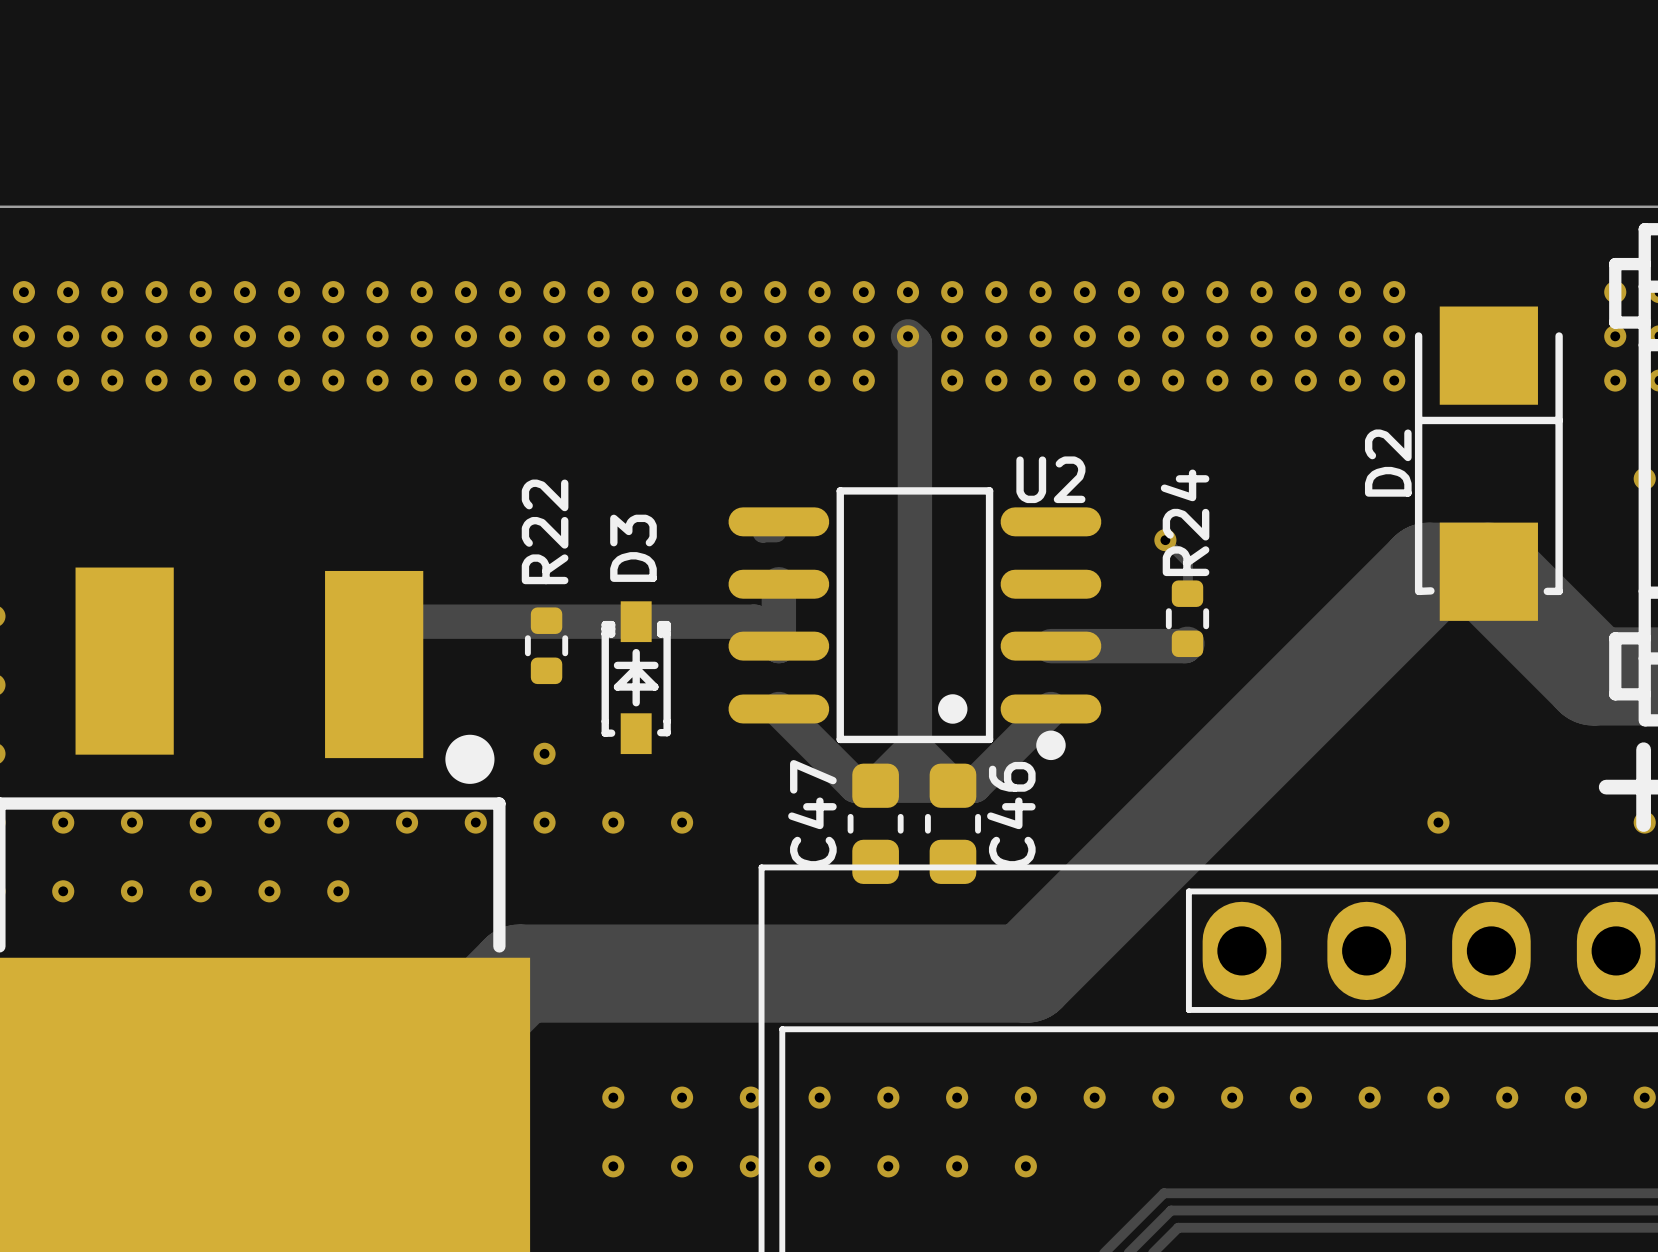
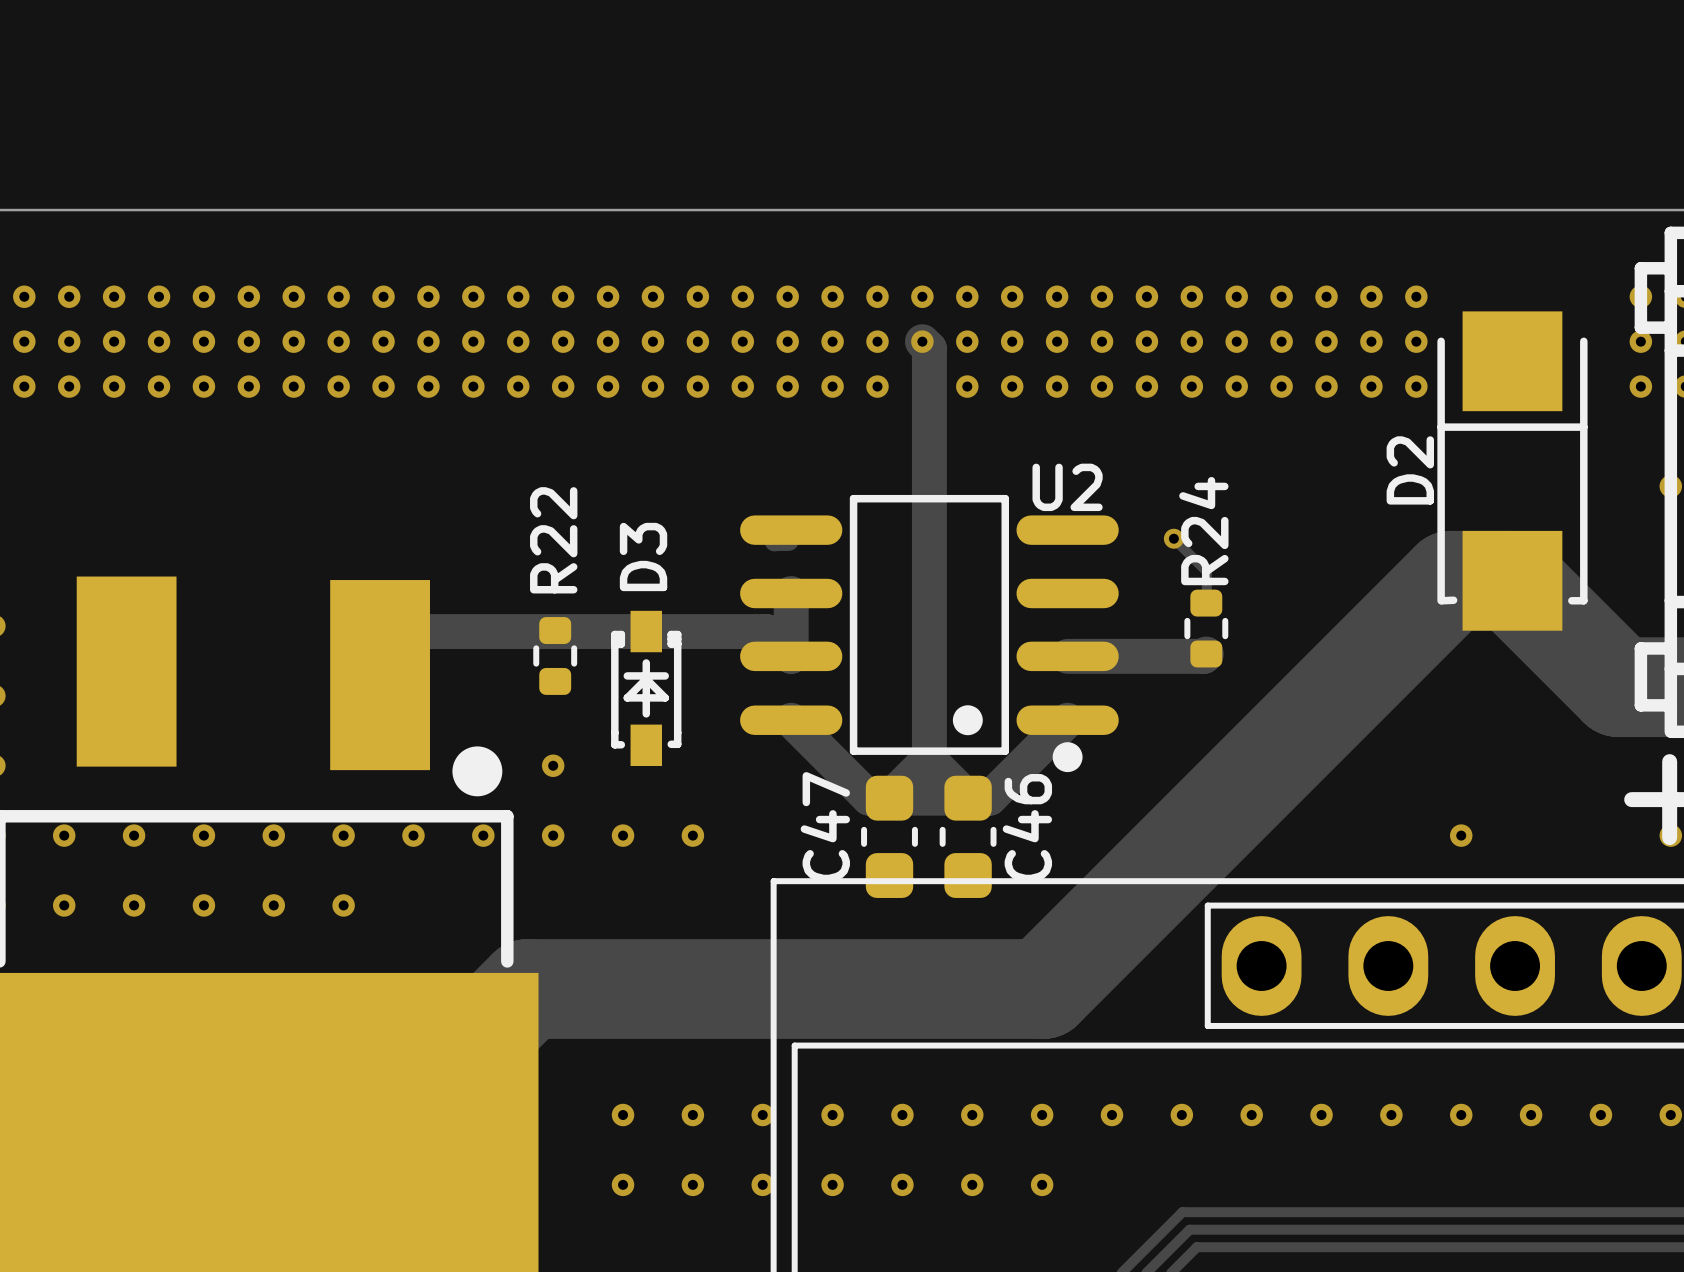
via position: (1165, 540) -> (1173, 538)

